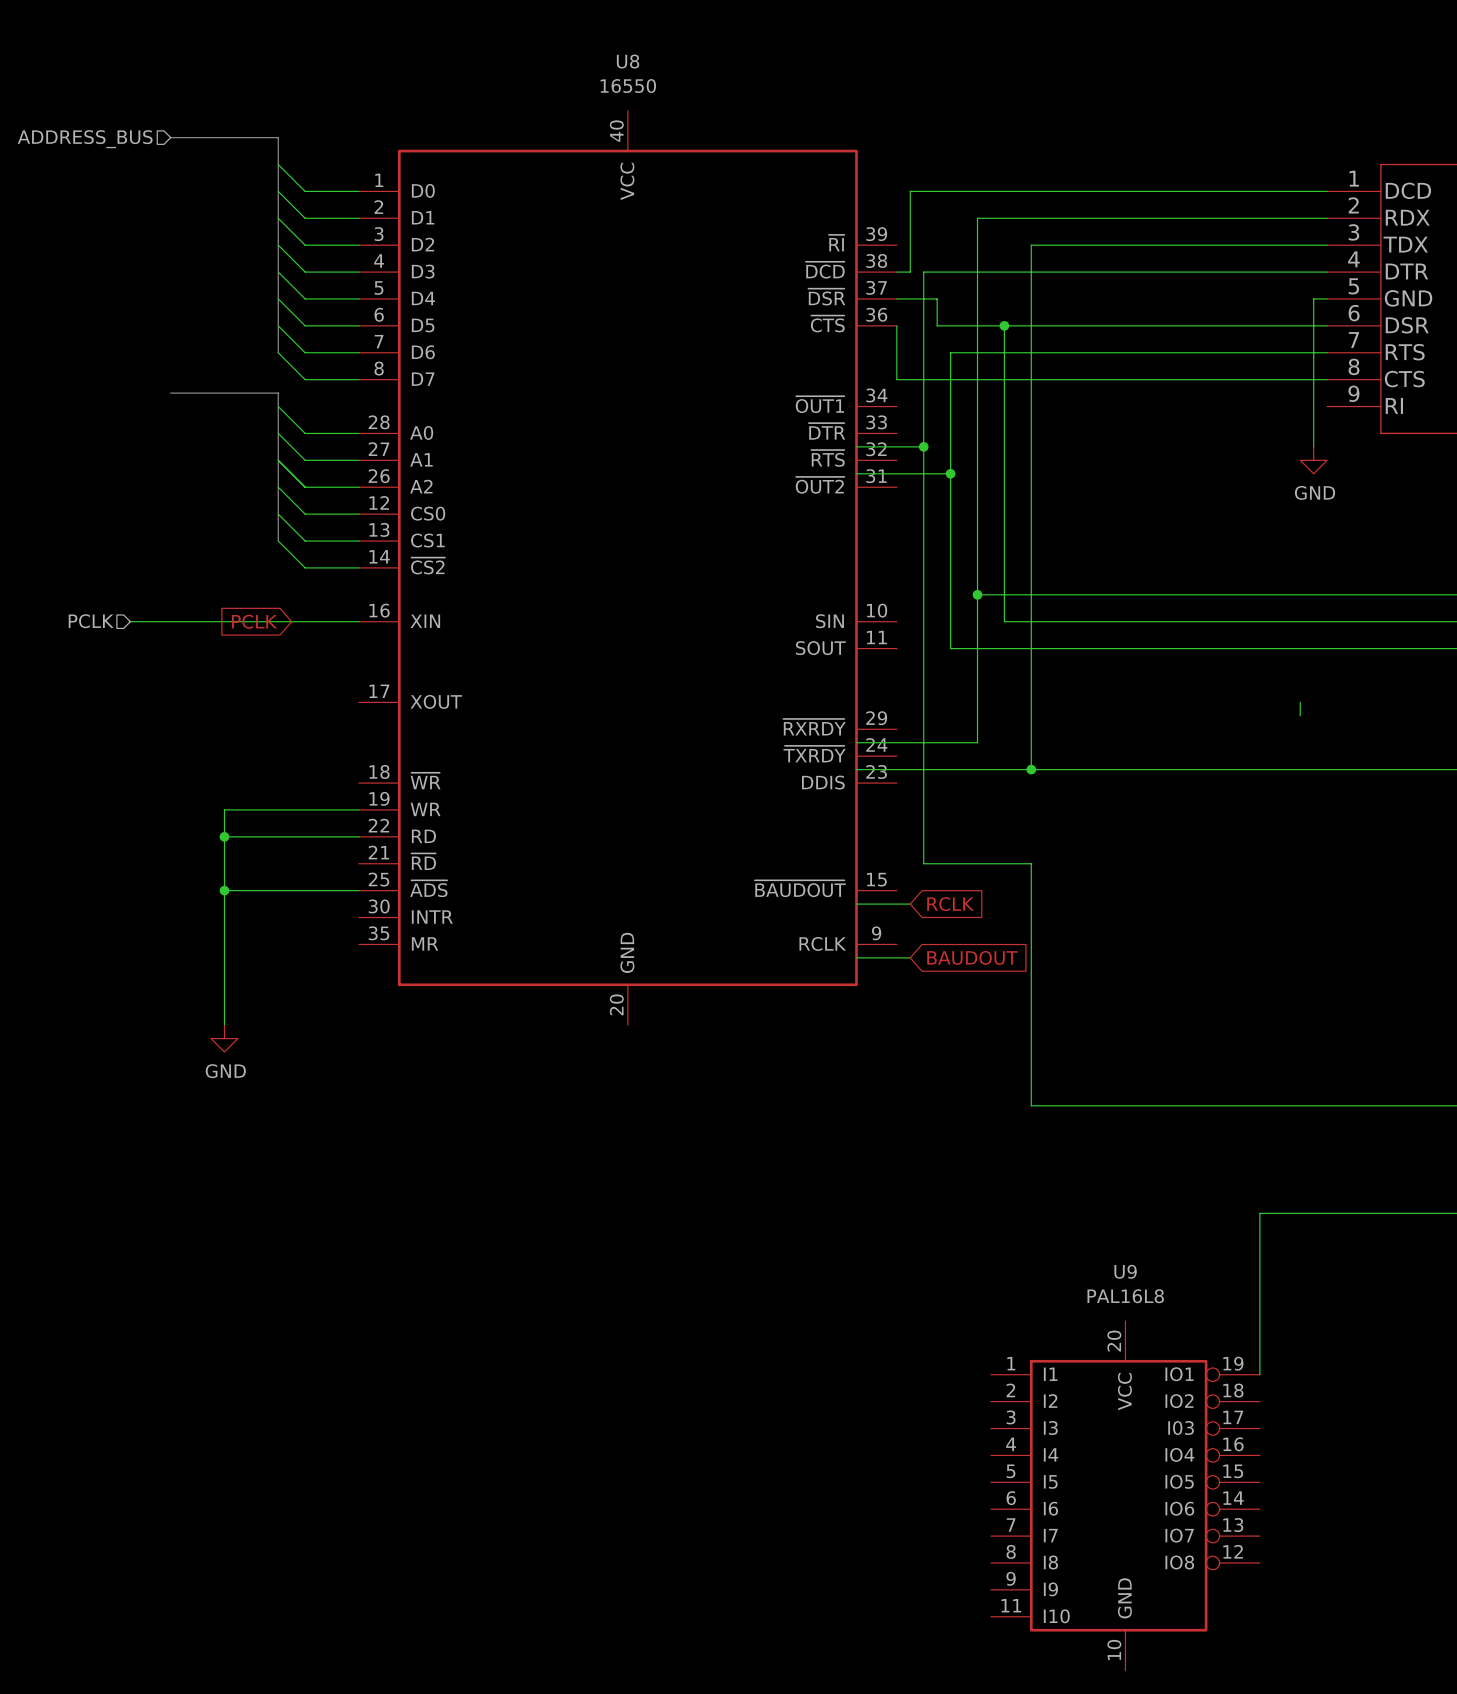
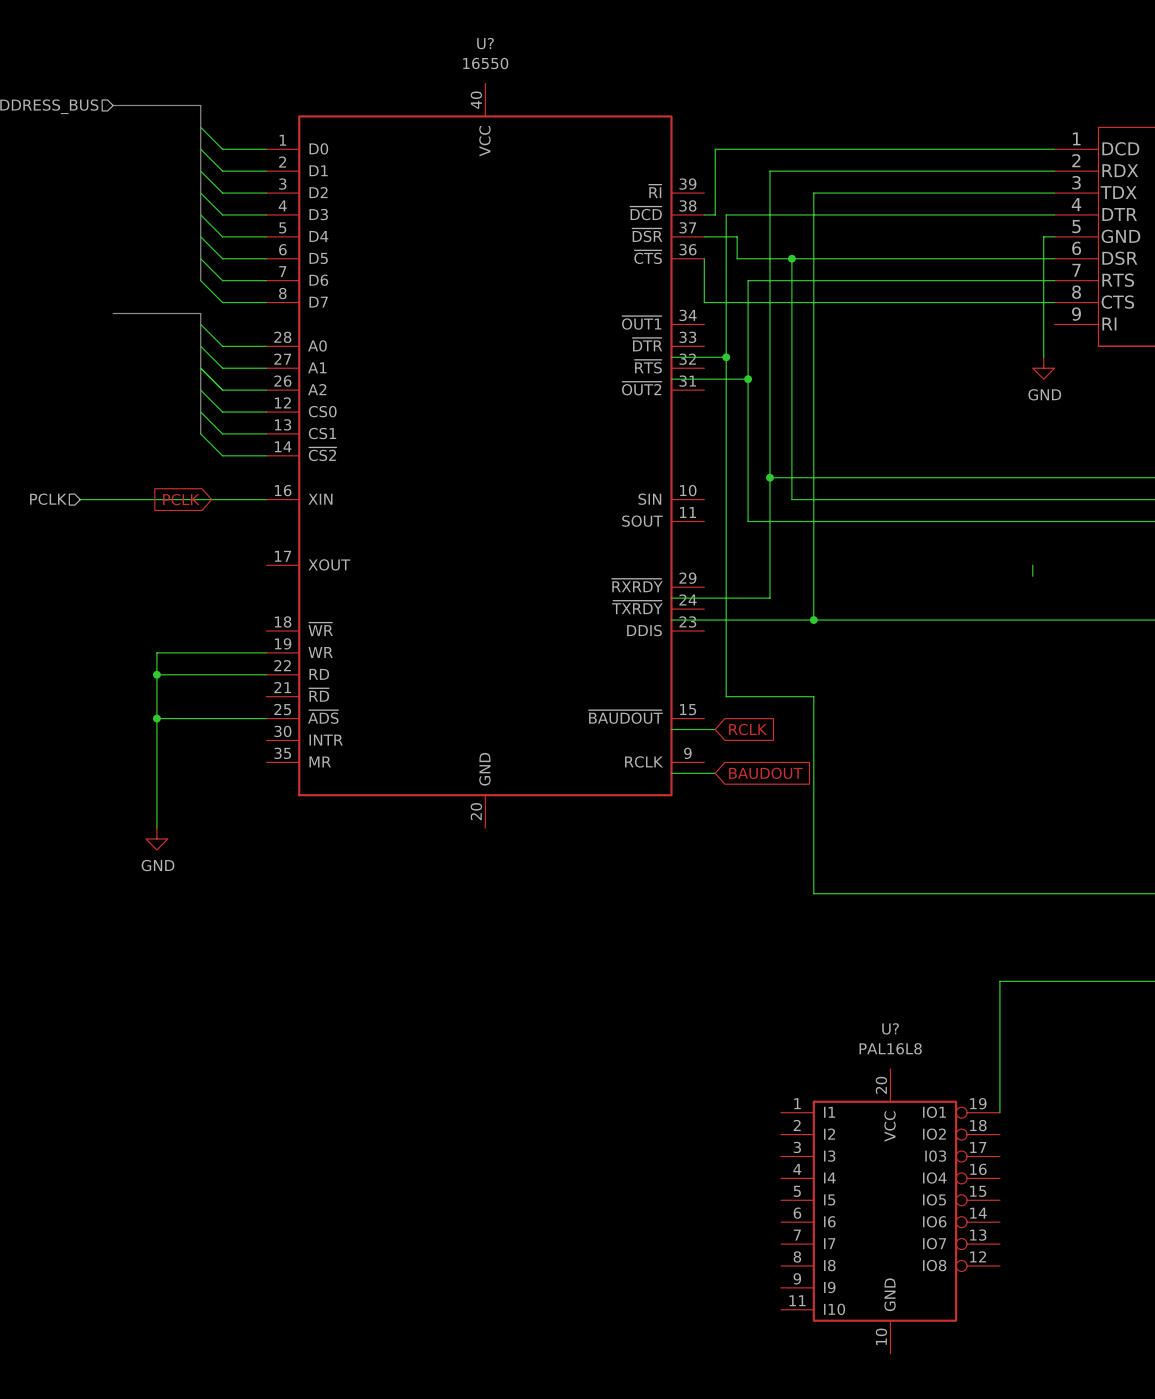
U8 name: U8 (628, 61) -> U? (485, 43)
U9 name: U9 (1125, 1271) -> U? (890, 1028)

